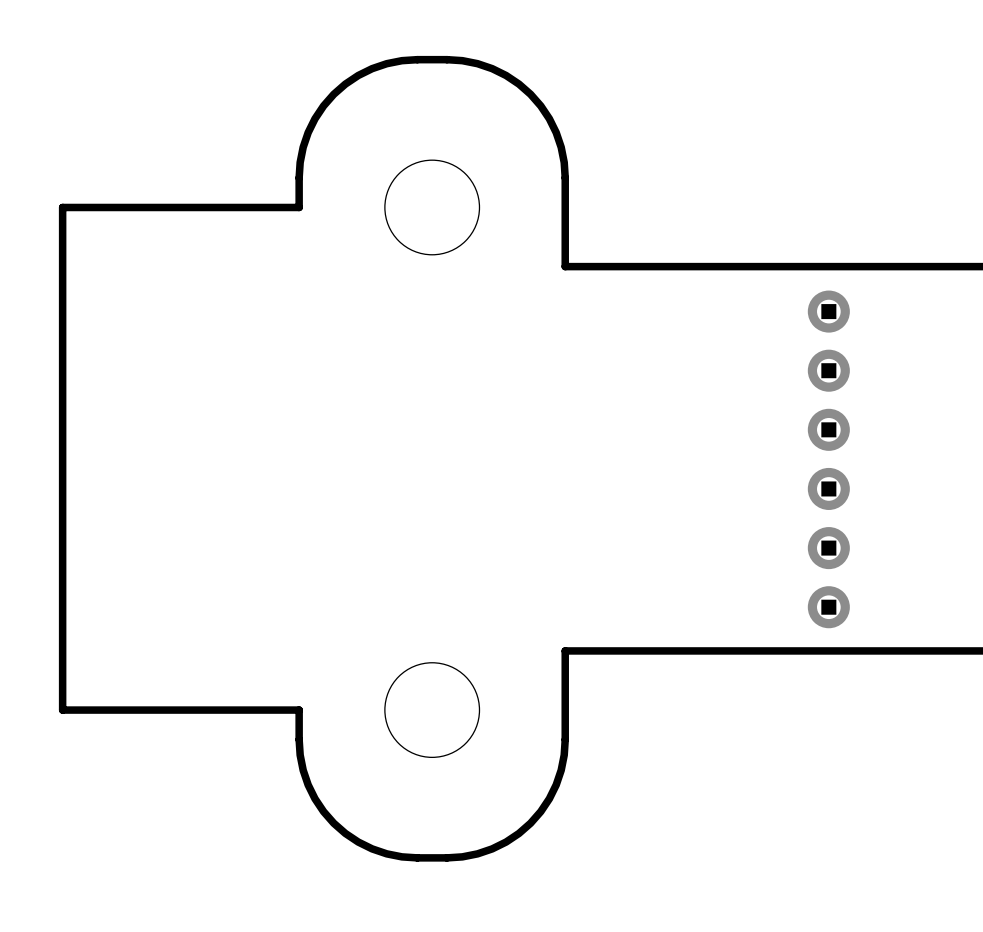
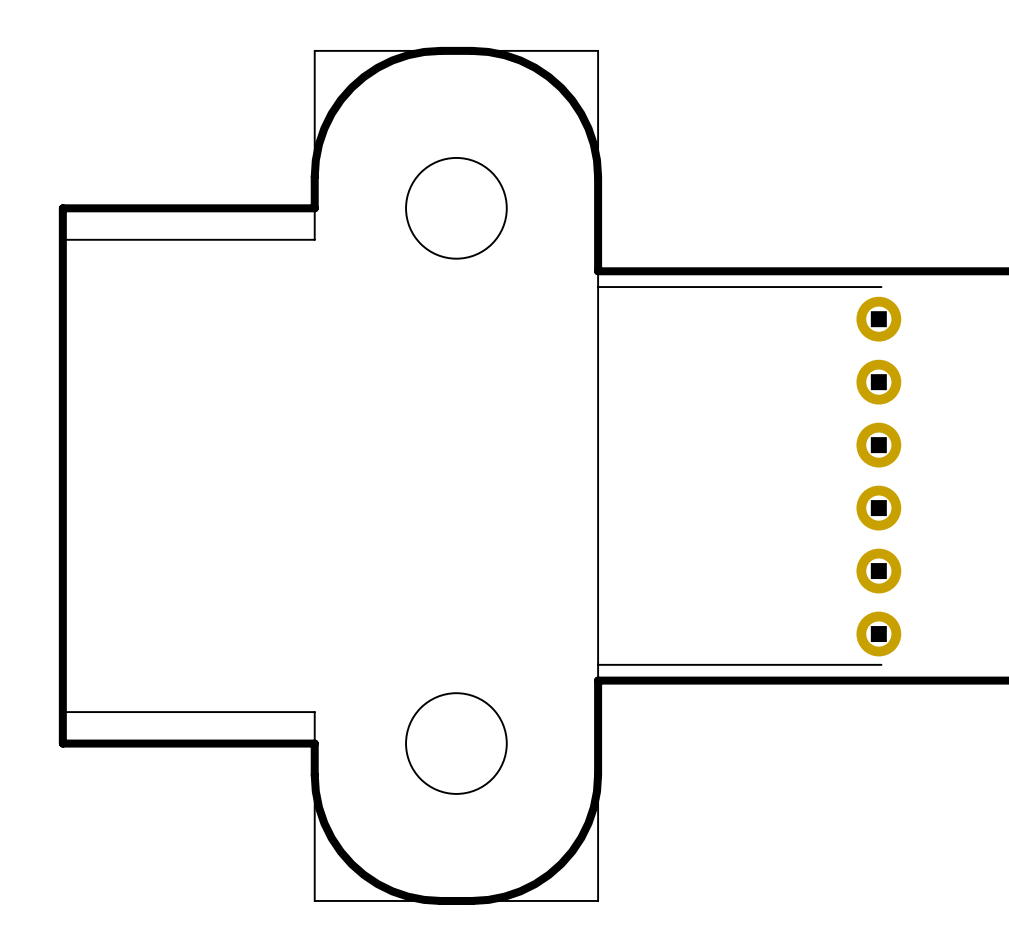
line: none -> (62, 239) (314, 239) (314, 50) (598, 50) (598, 900) (314, 900) (314, 712) (62, 712)
line: none -> (598, 287) (881, 287)
line: none -> (598, 664) (881, 664)

